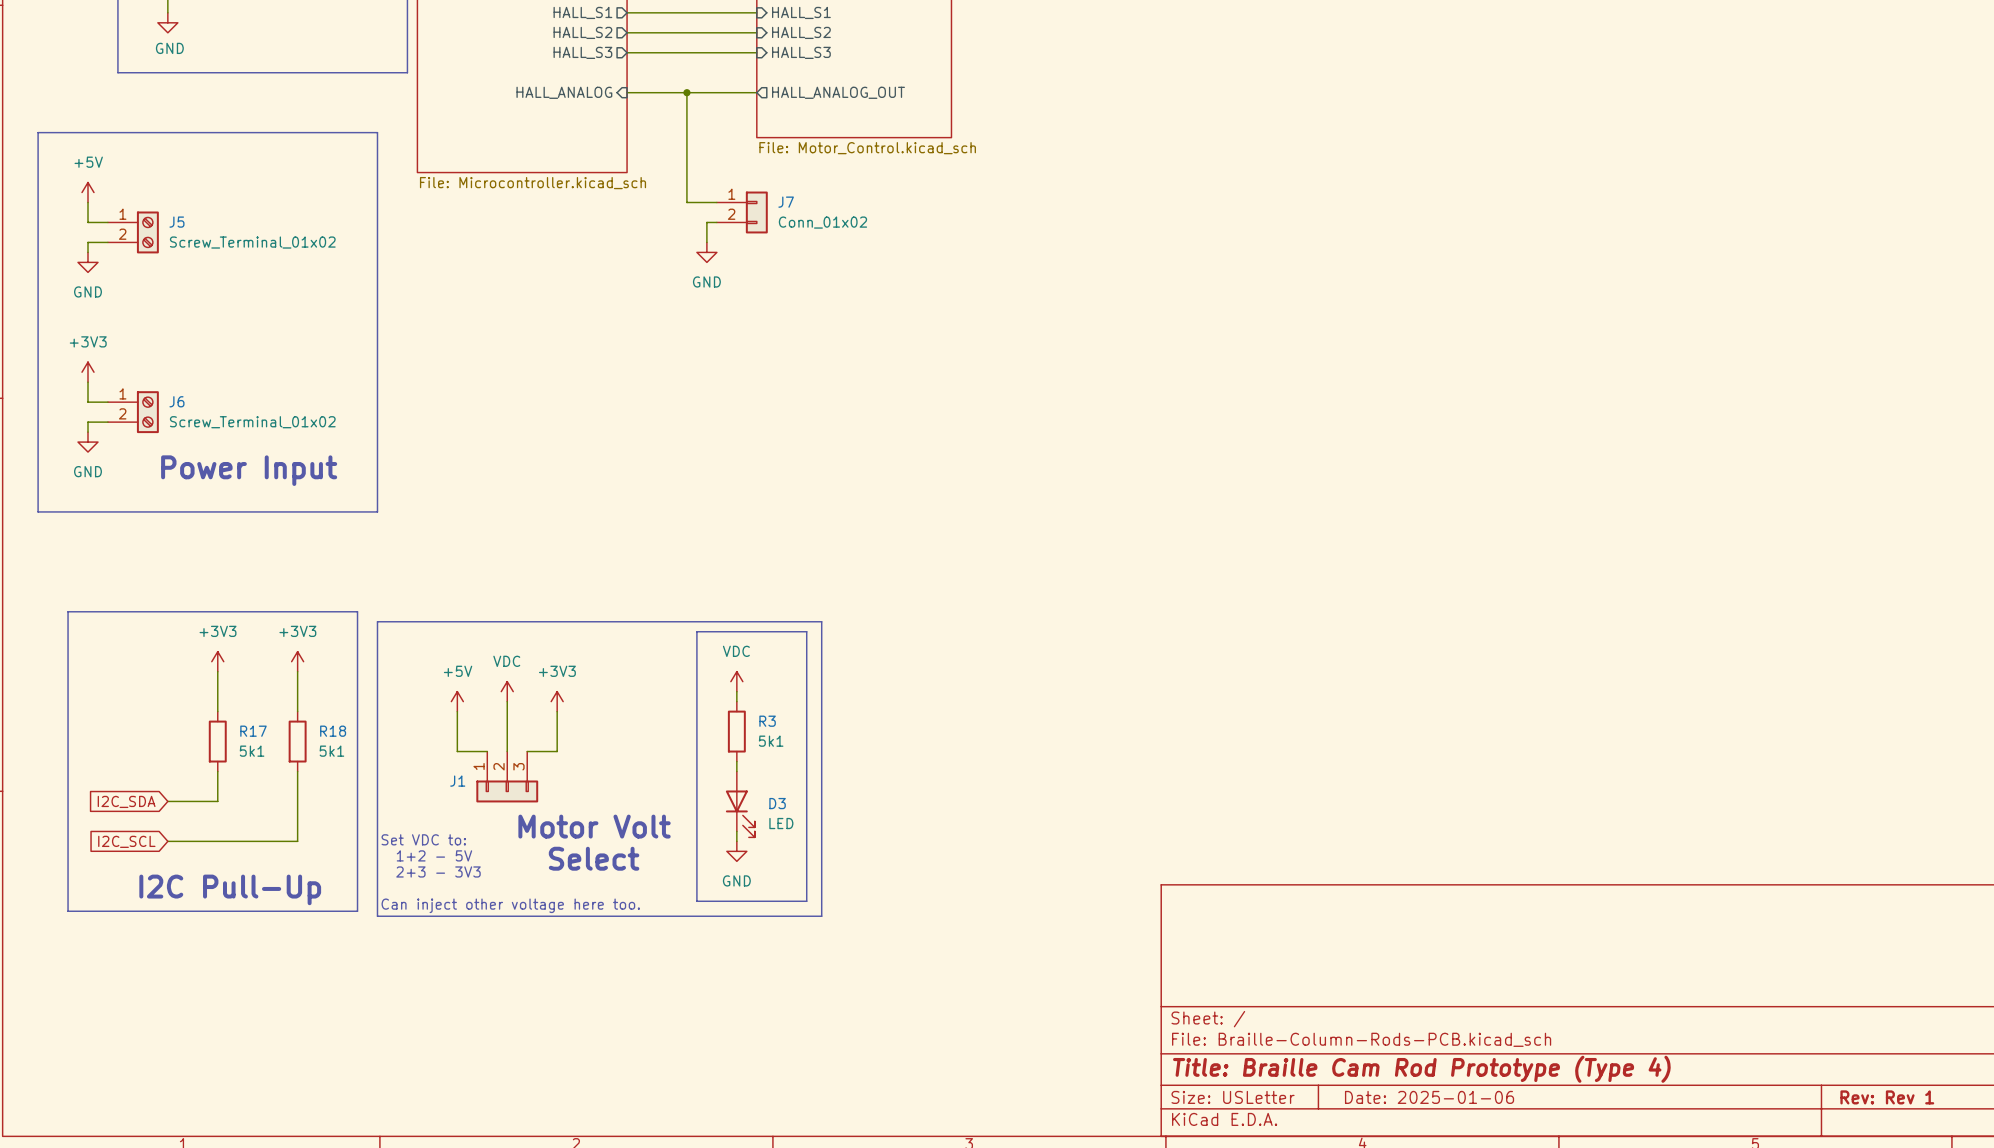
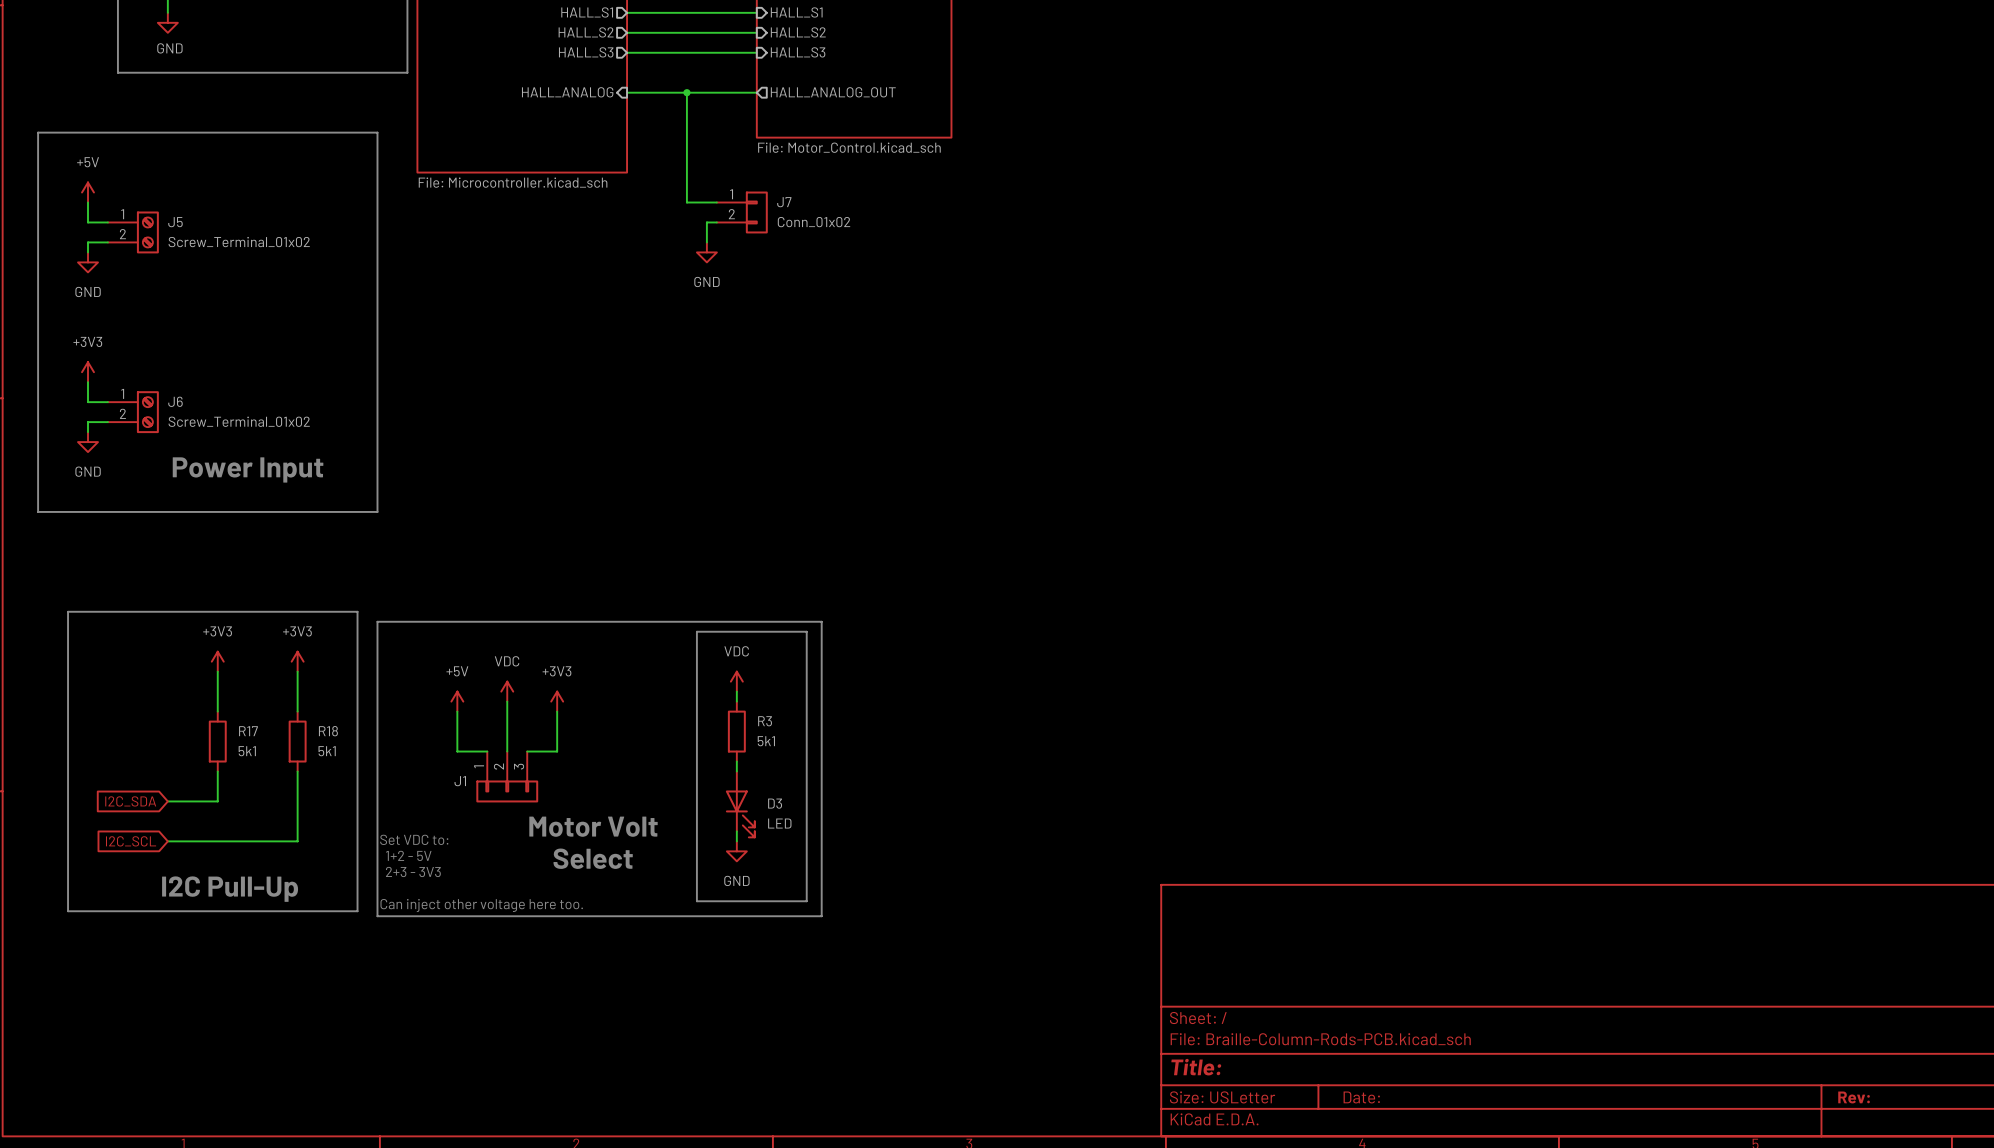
title block: Title: Braille Cam Rod Prototype (Type 4) (1421, 1069) -> Title: (1196, 1067)
title block: Date: 2025-01-06 (1429, 1097) -> Date: (1361, 1097)
title block: Rev: Rev 1 (1887, 1097) -> Rev: (1854, 1097)

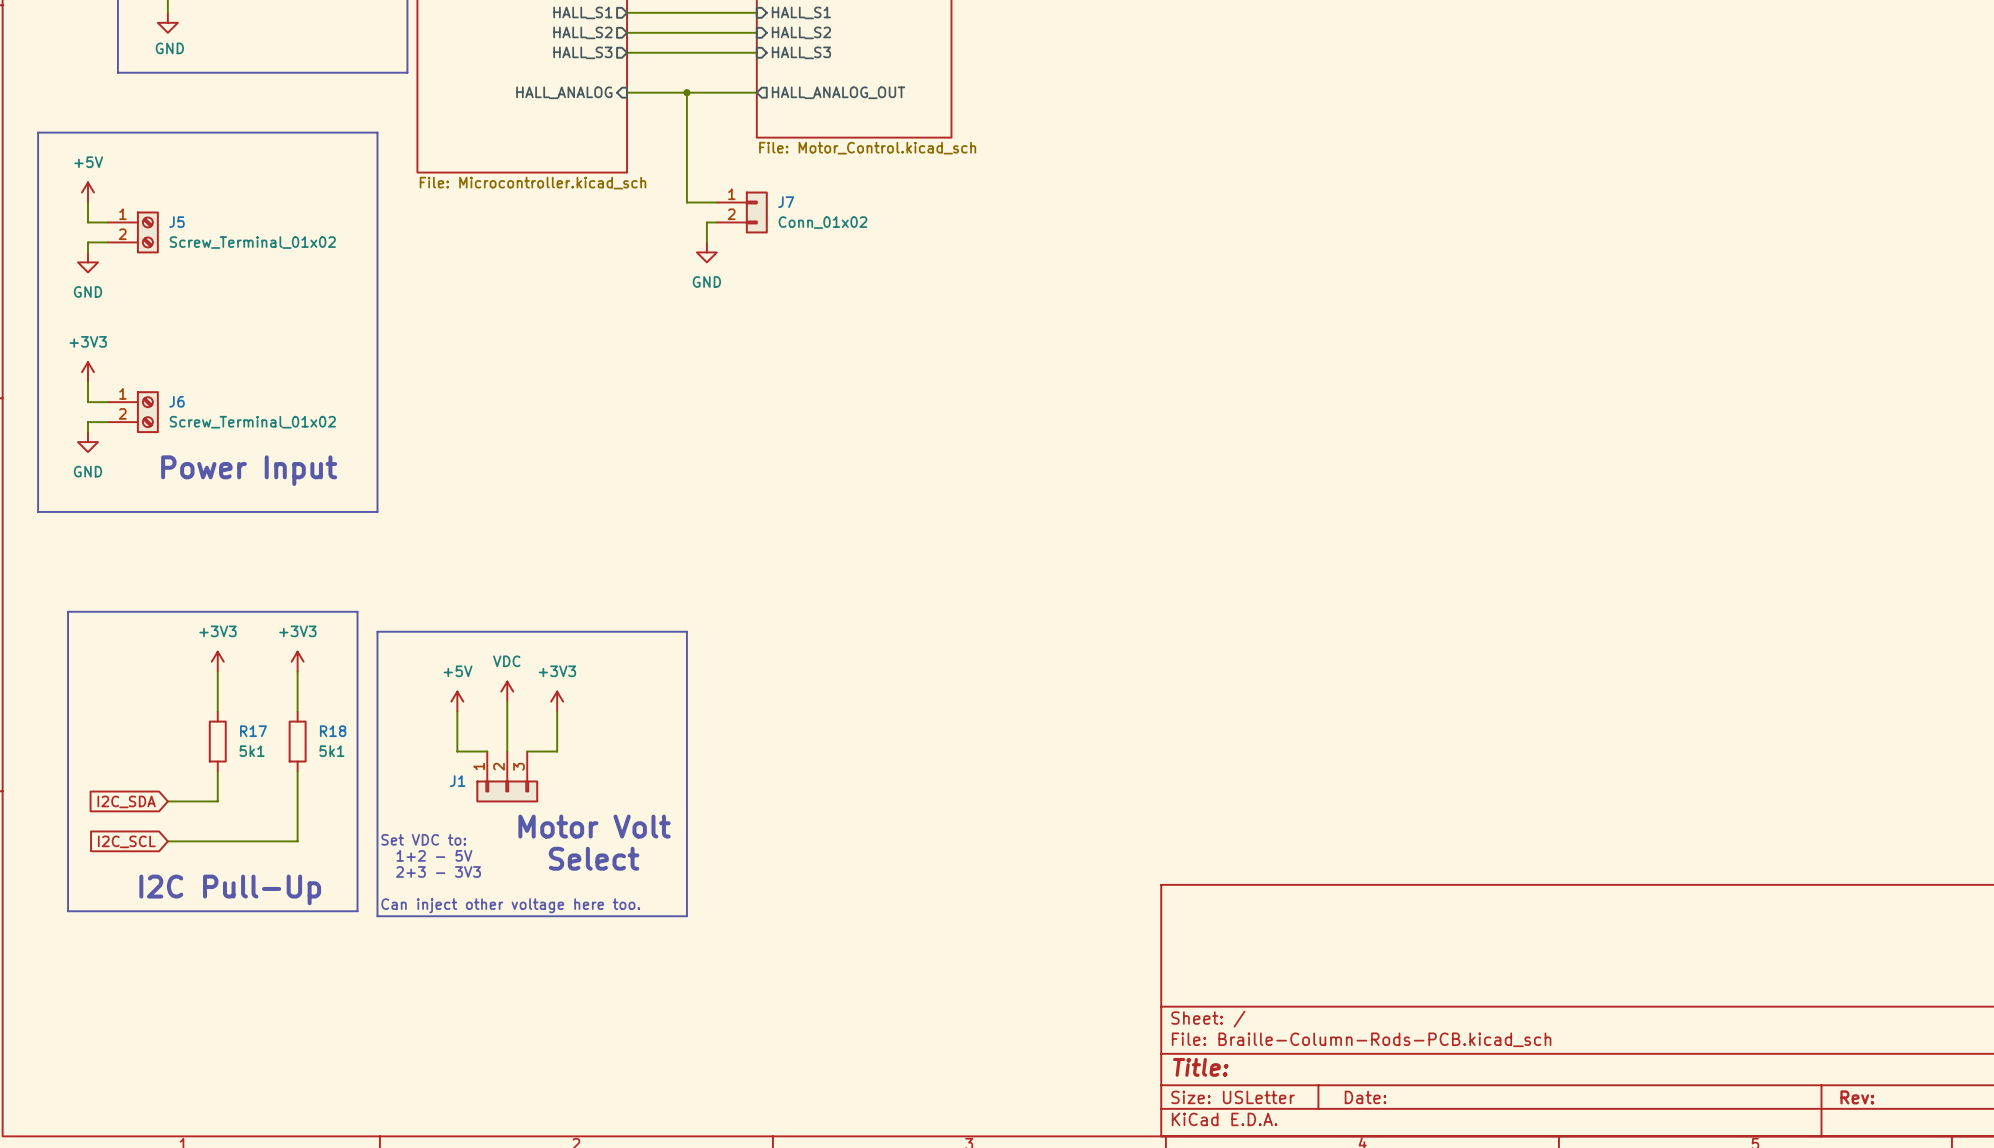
line: (377, 631) (377, 621) (821, 621) (821, 916) (686, 916) -> (377, 631) (686, 631) (686, 916)
line: (696, 631) (806, 631) (806, 901) (696, 901) (696, 631) -> none
power symbol: VDC (736, 681) -> none
wire: (736, 691) (736, 701) -> none
R3: 5k1 (736, 731) -> none
wire: (736, 761) (736, 771) -> none
D3: LED (740, 804) -> none
wire: (736, 831) (736, 841) -> none
power symbol: GND (736, 851) -> none

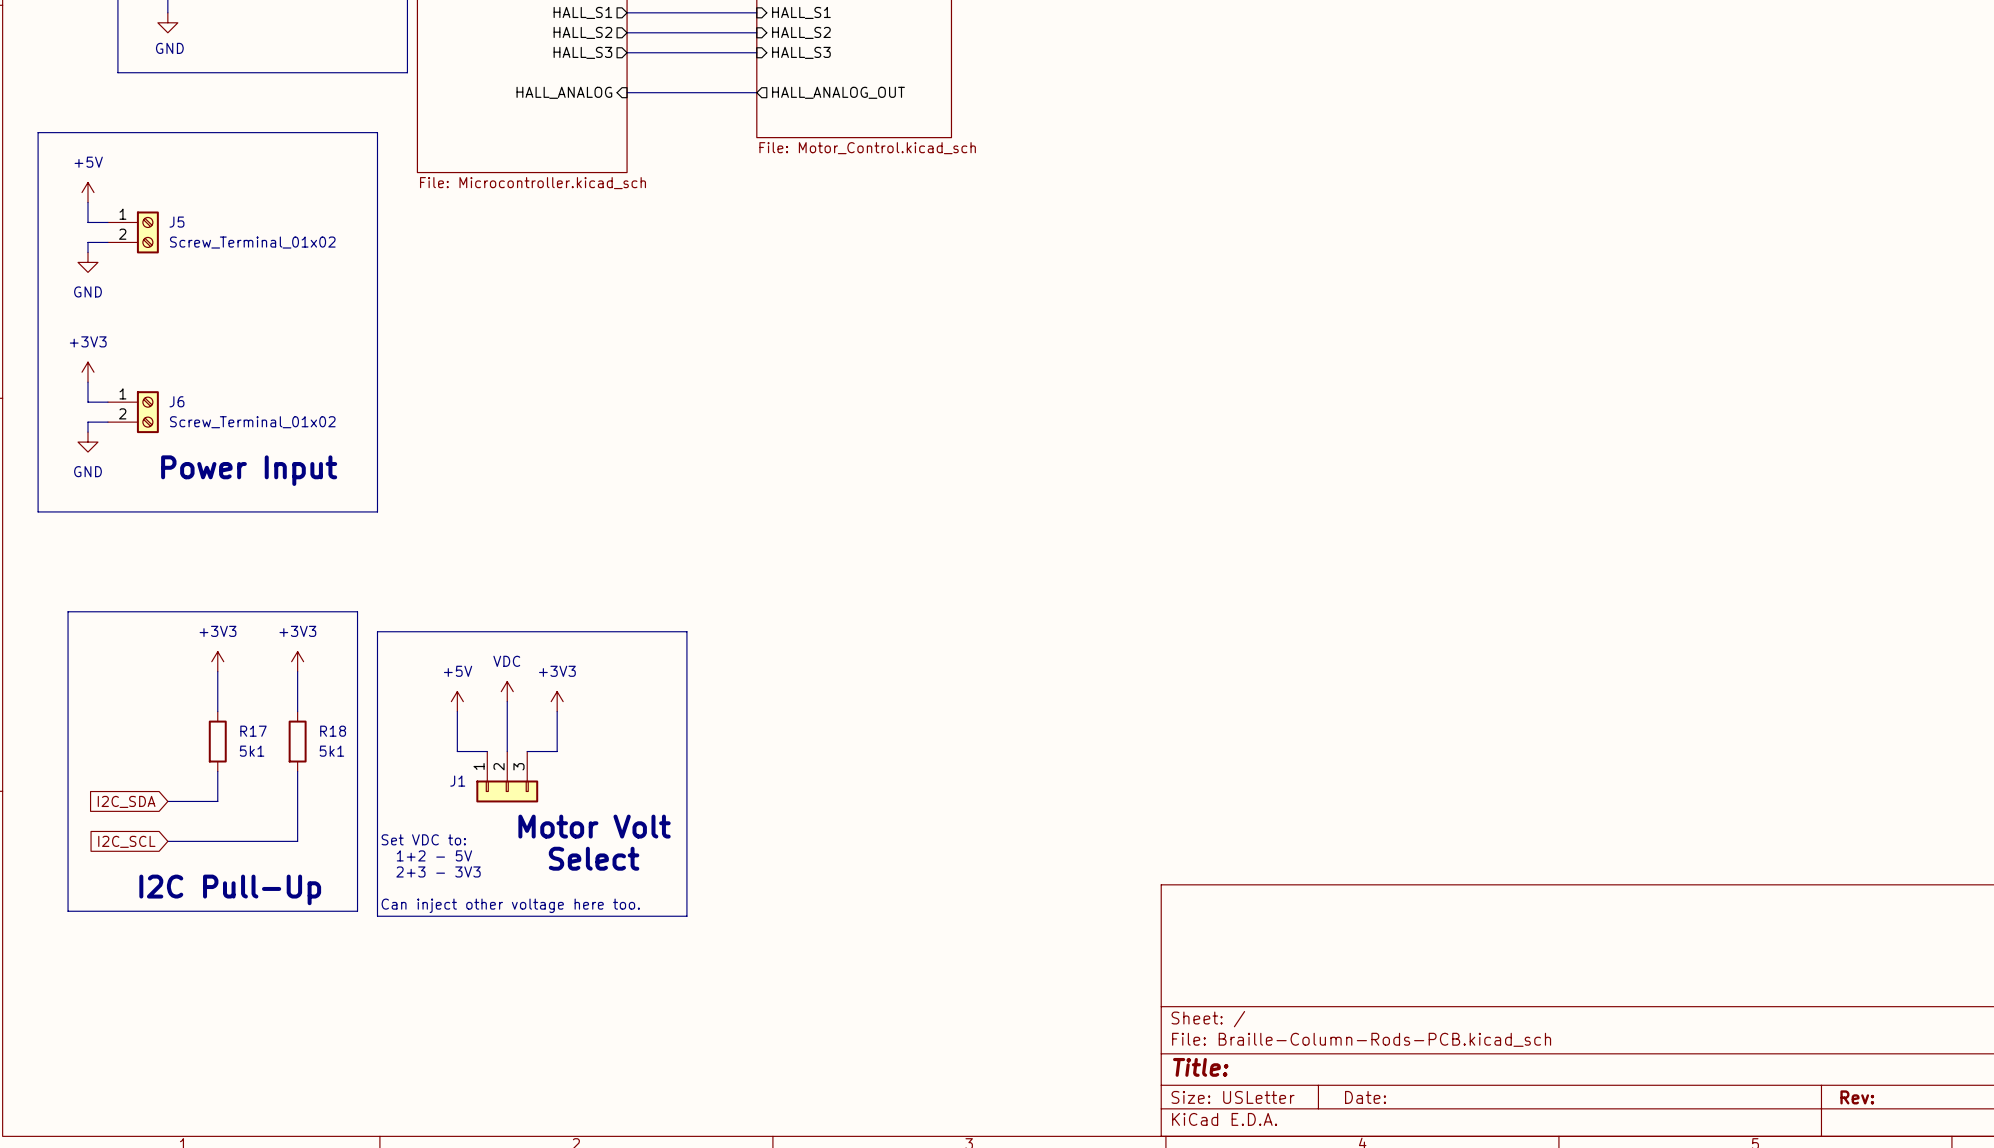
wire: (686, 92) (686, 202) (716, 202) -> none
junction: (686, 92) -> none
J7: Conn_01x02 (742, 212) -> none
wire: (716, 222) (706, 222) (706, 242) -> none
power symbol: GND (706, 252) -> none

